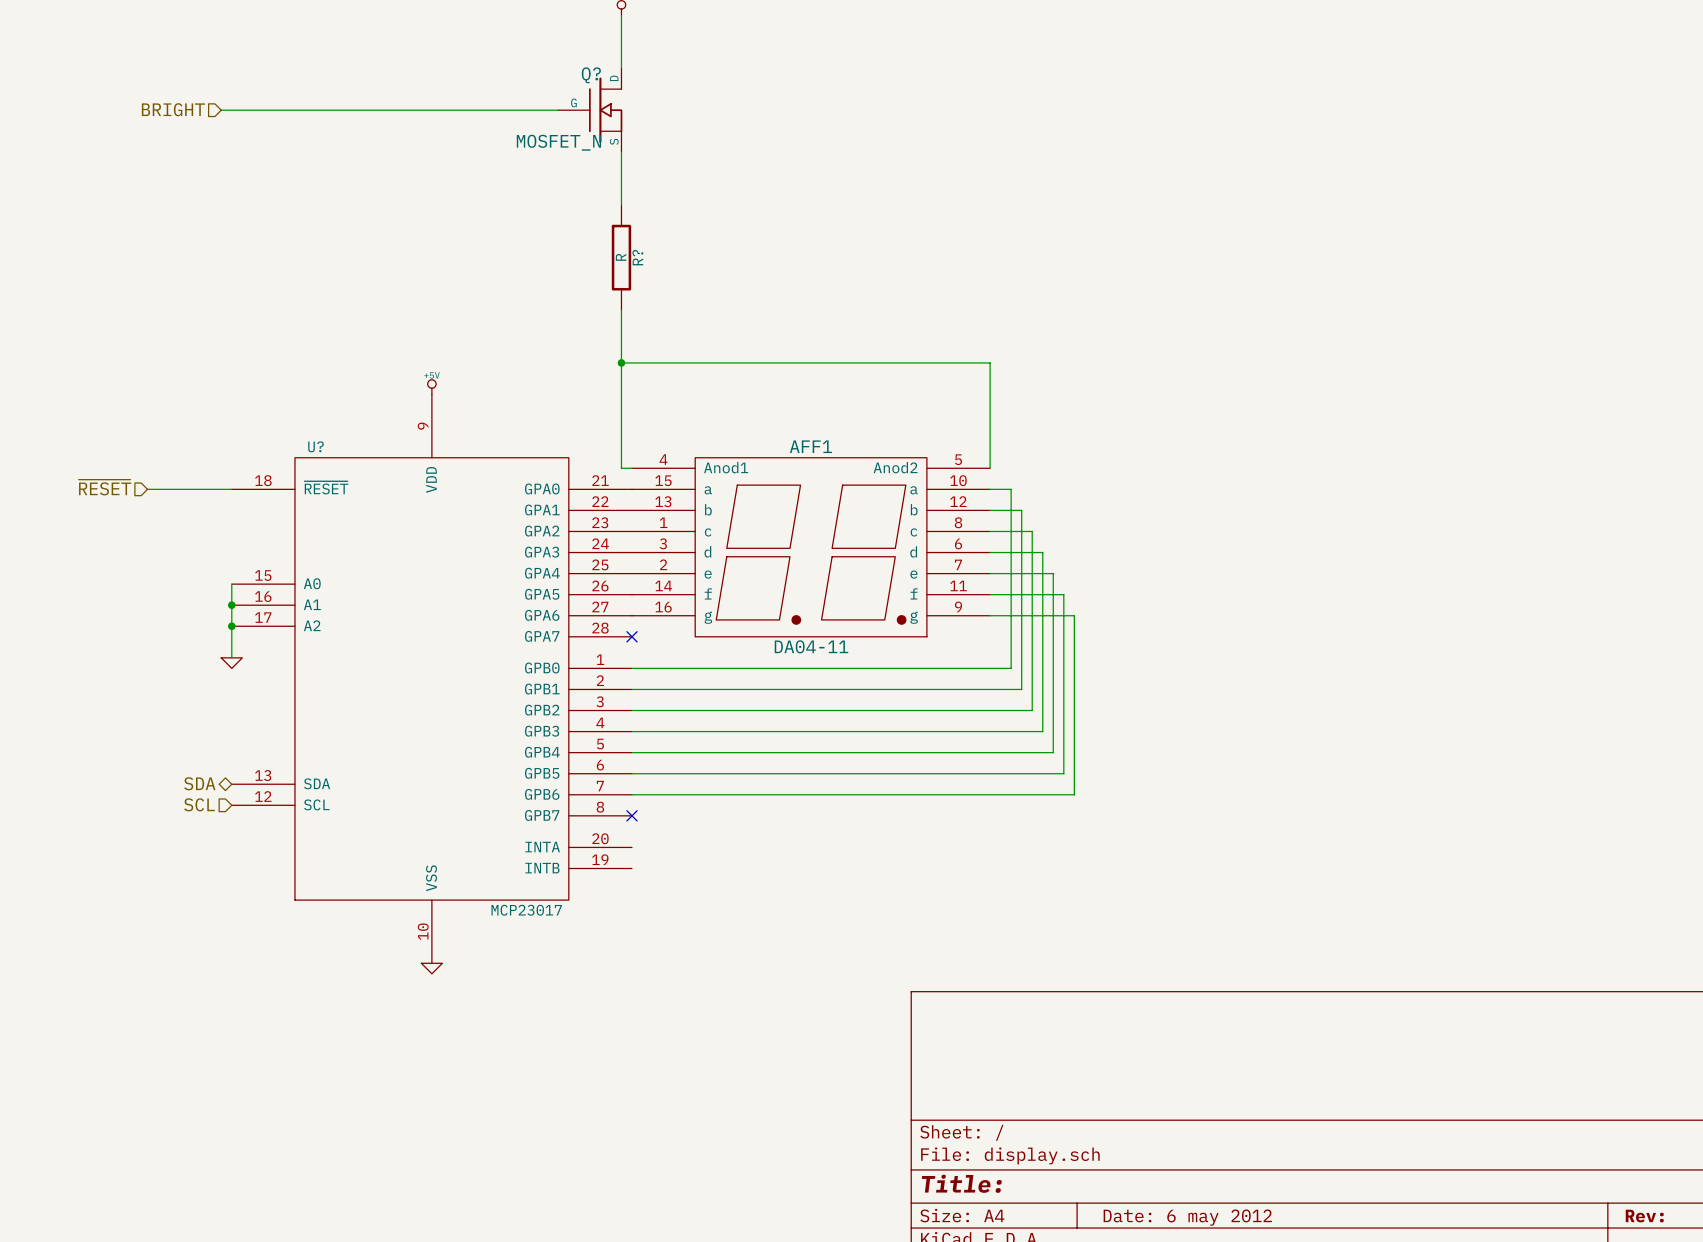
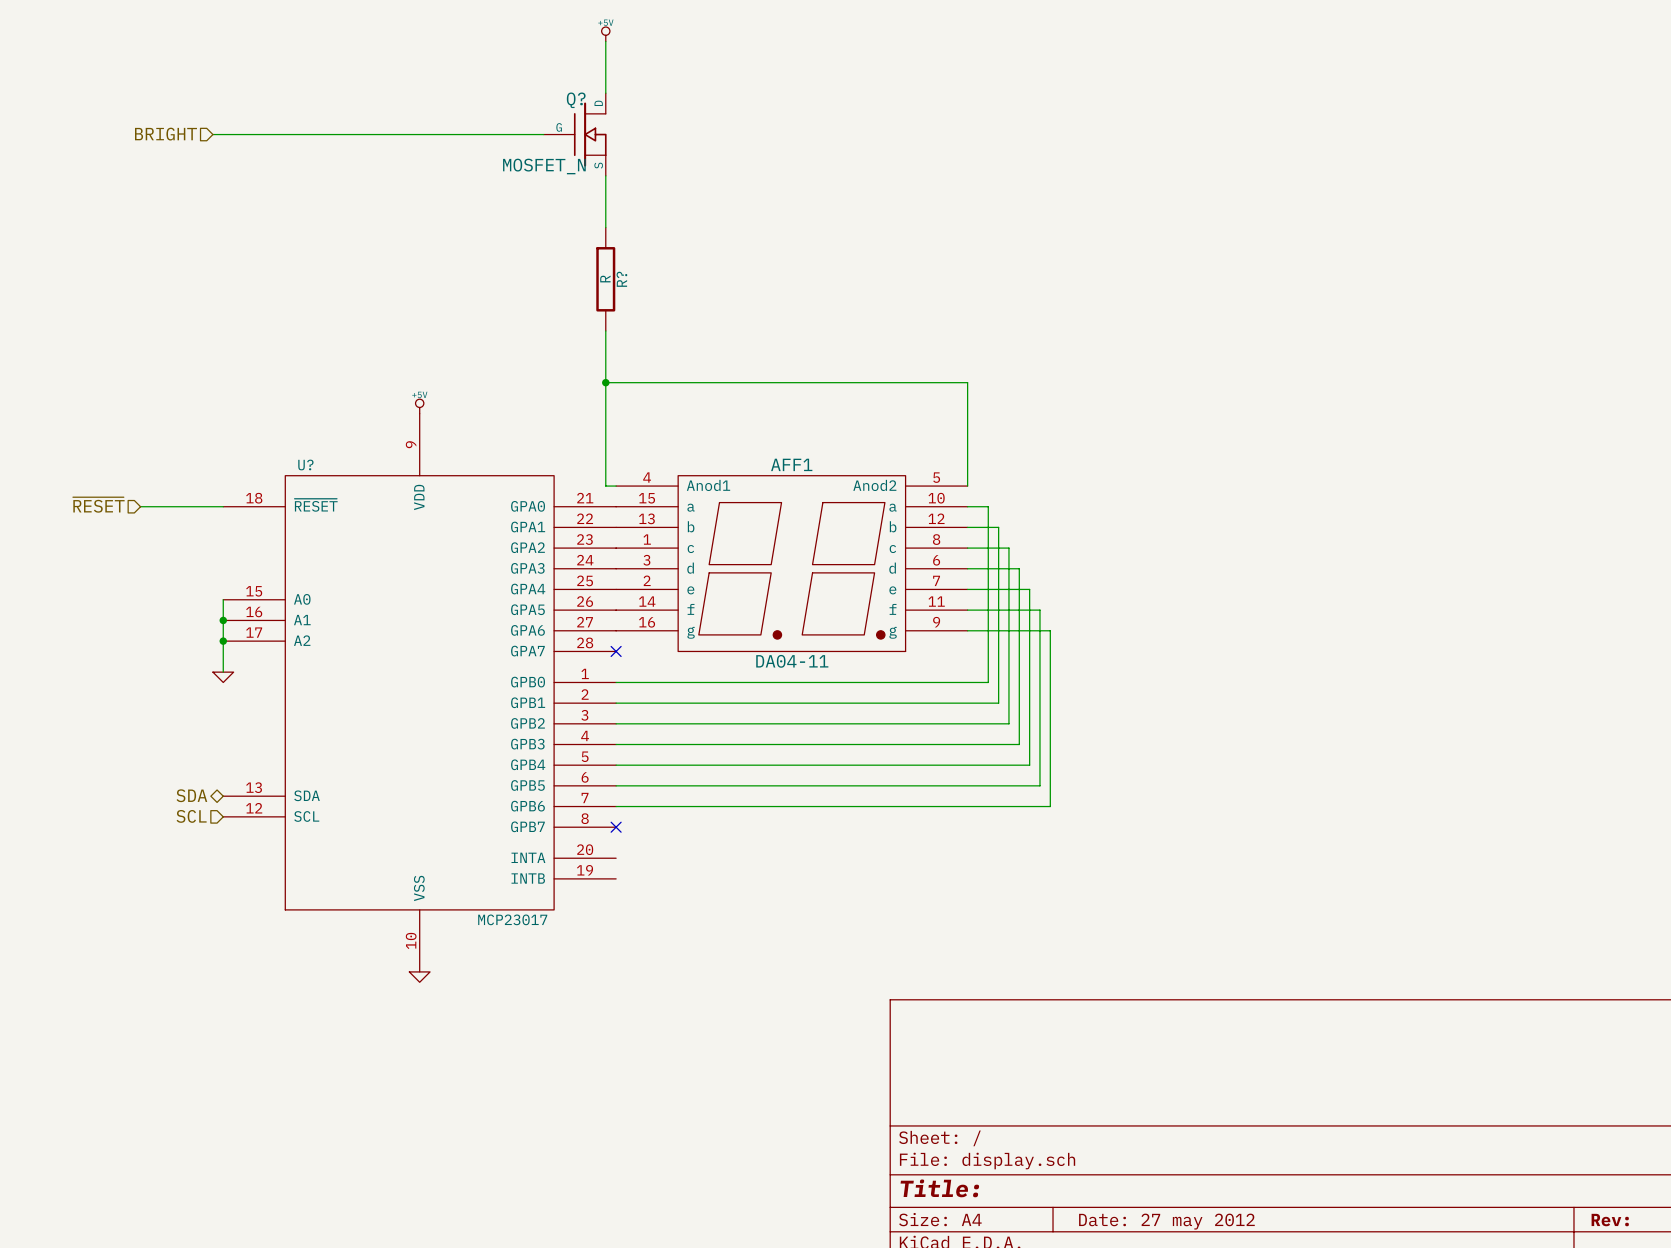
title block: Date: 6 may 2012 (1187, 1217) -> Date: 27 may 2012 (1166, 1221)

